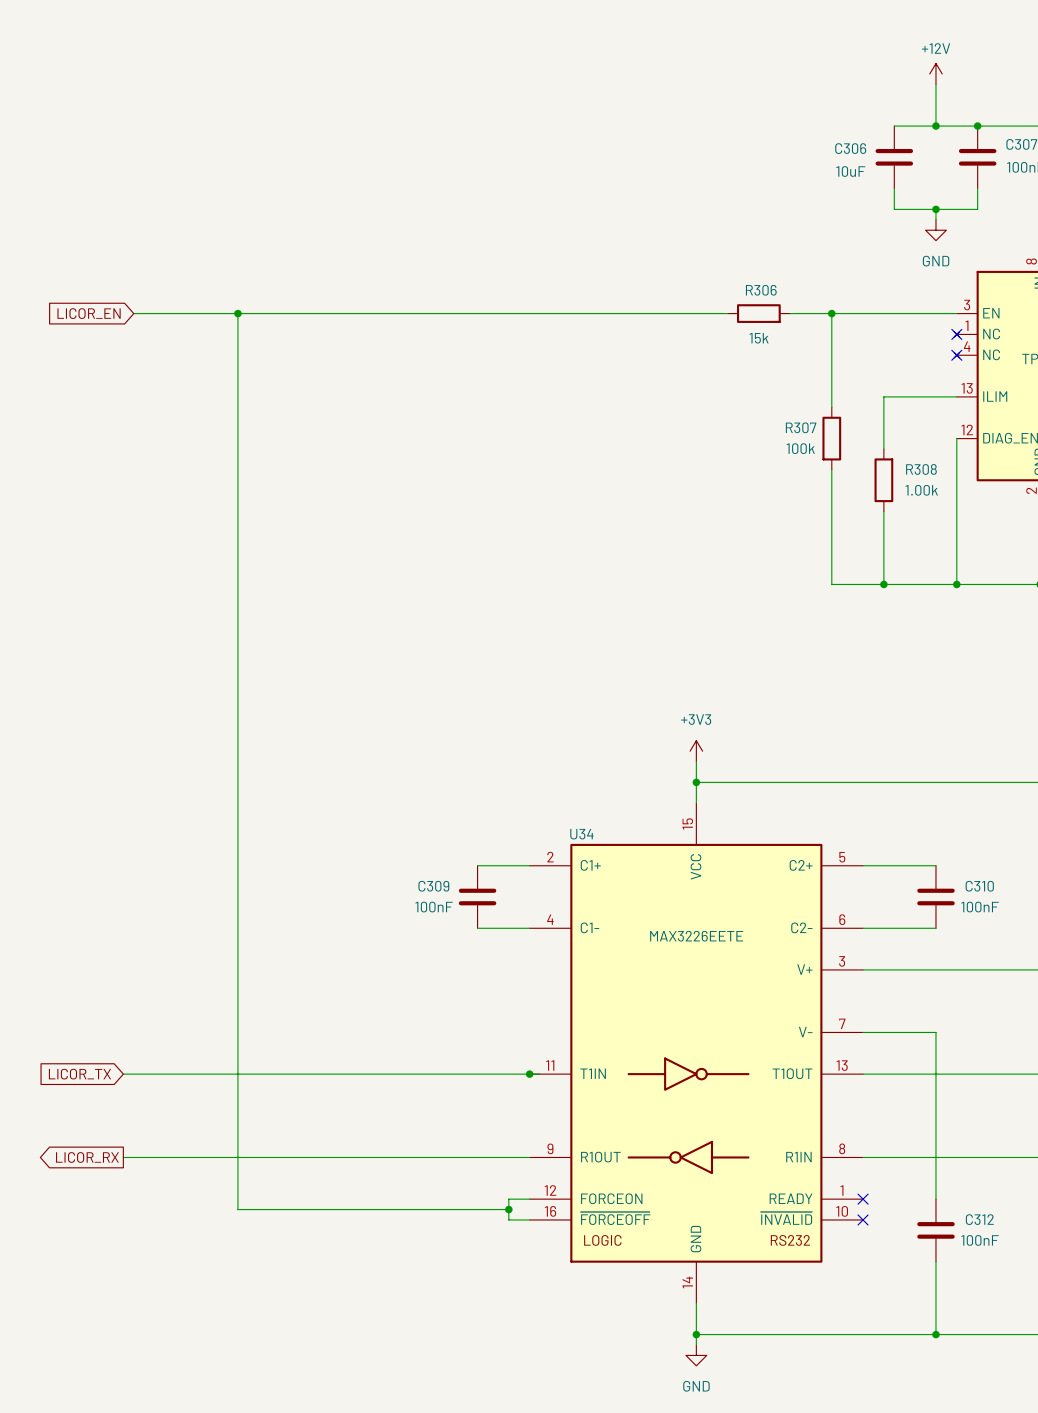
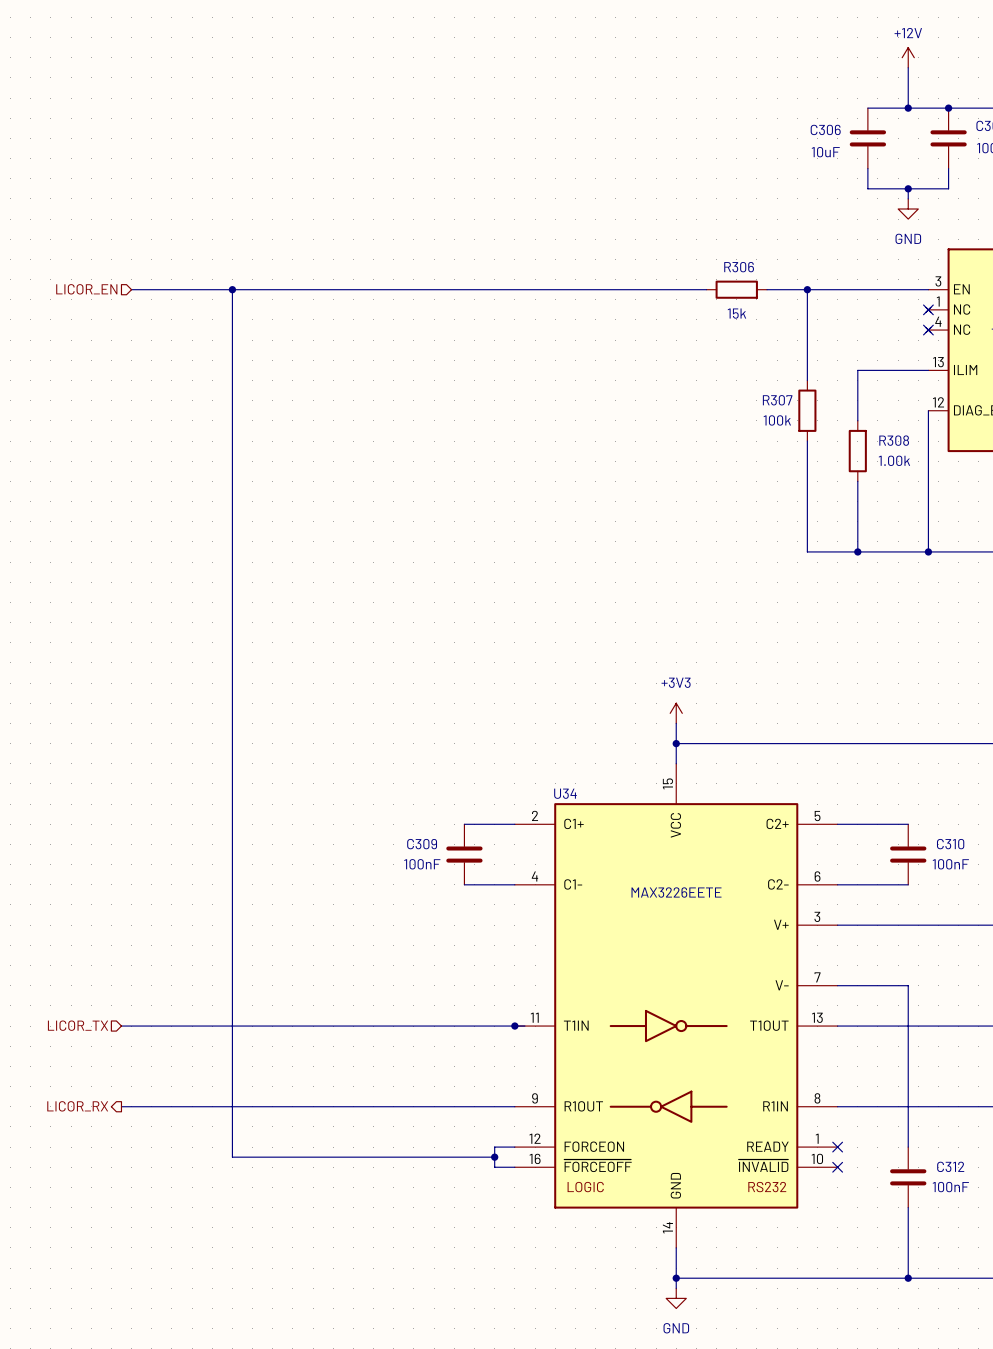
hierarchical label: none -> LICOR_EN (86, 289)
global label: LICOR_EN (89, 313) -> none
hierarchical label: none -> LICOR_TX (78, 1025)
global label: LICOR_TX (79, 1074) -> none
hierarchical label: none -> LICOR_RX (77, 1106)
global label: LICOR_RX (87, 1157) -> none

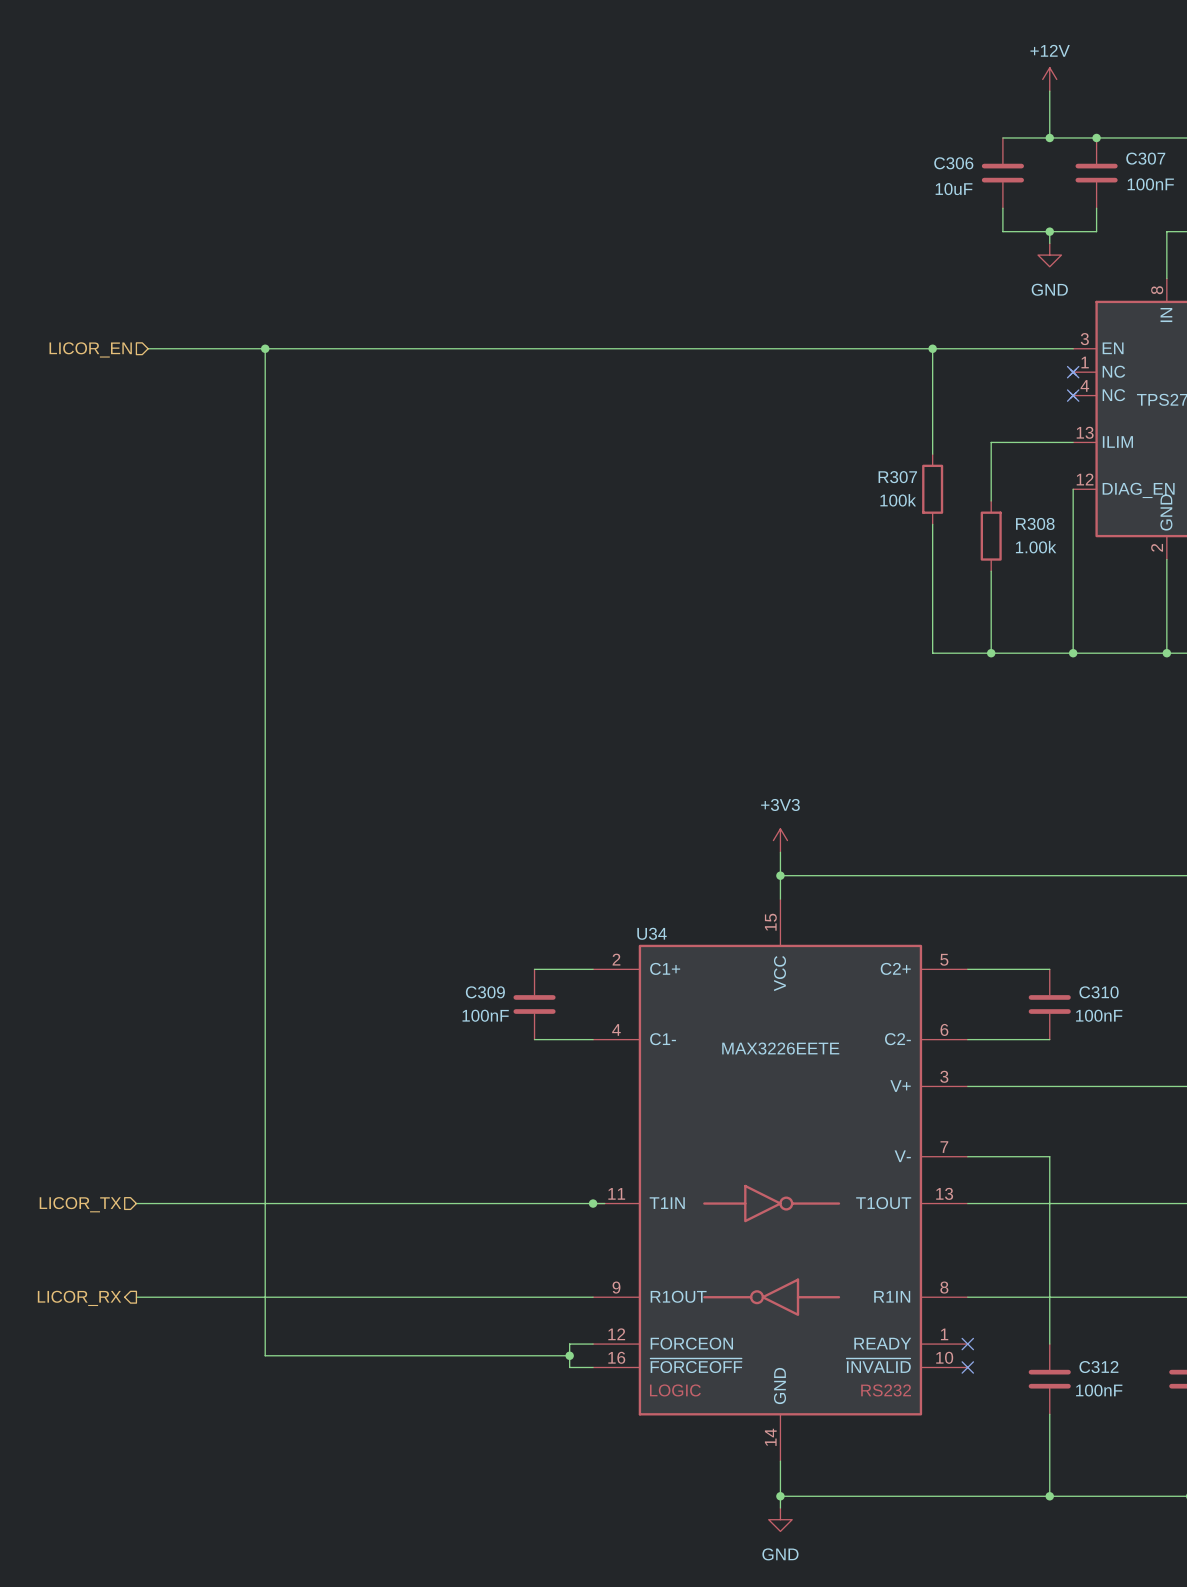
wire: none -> (815, 348) (885, 348)
R306: 15k (736, 289) -> none

